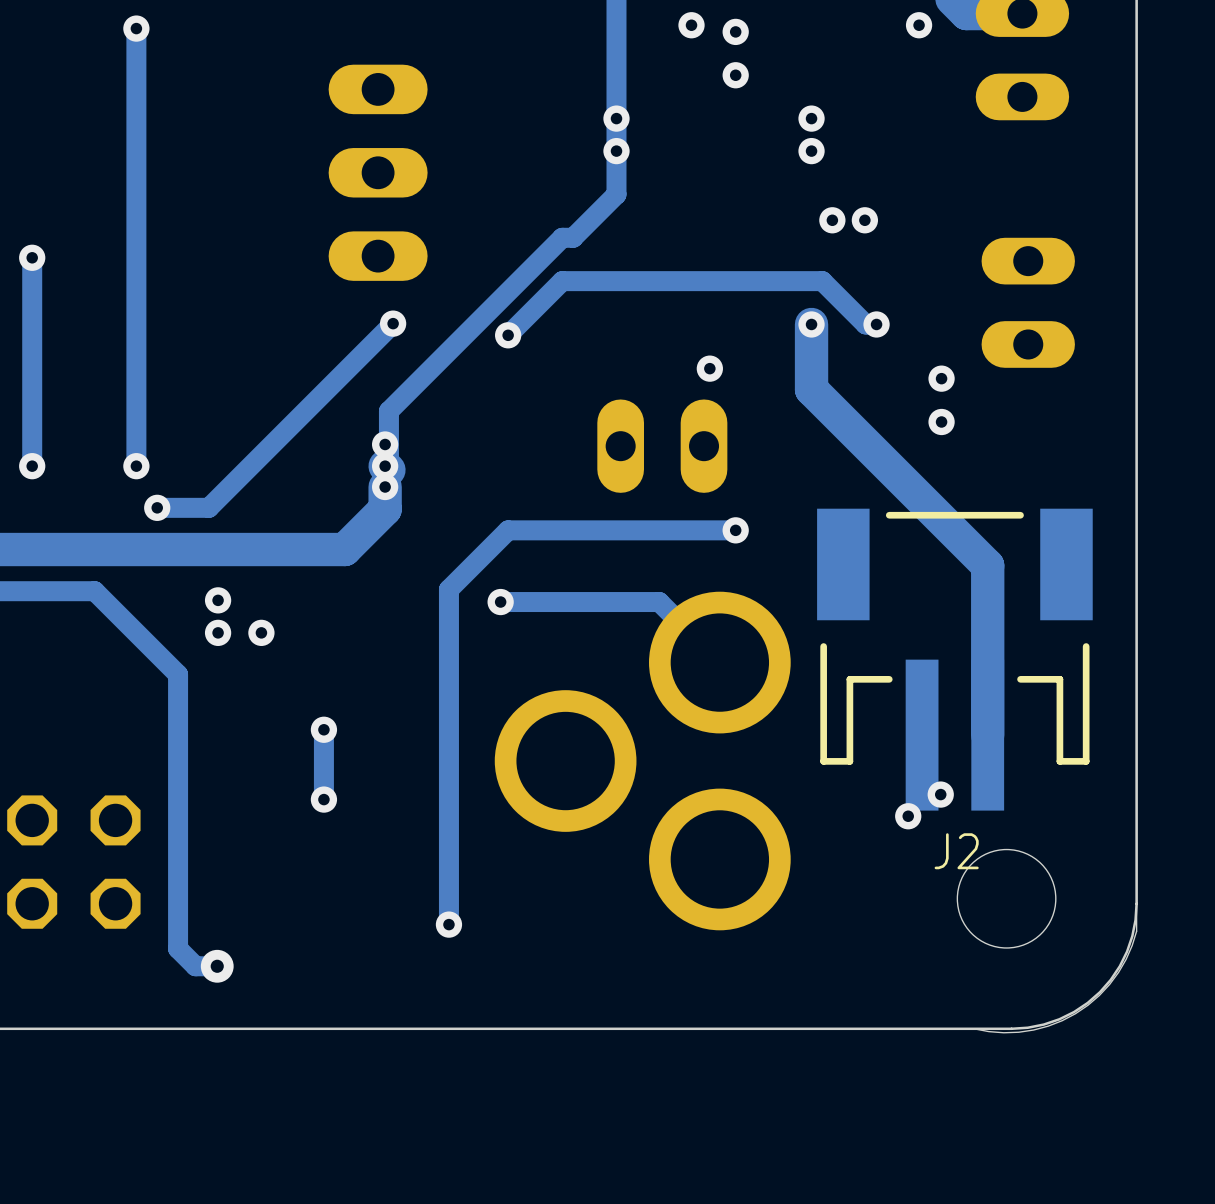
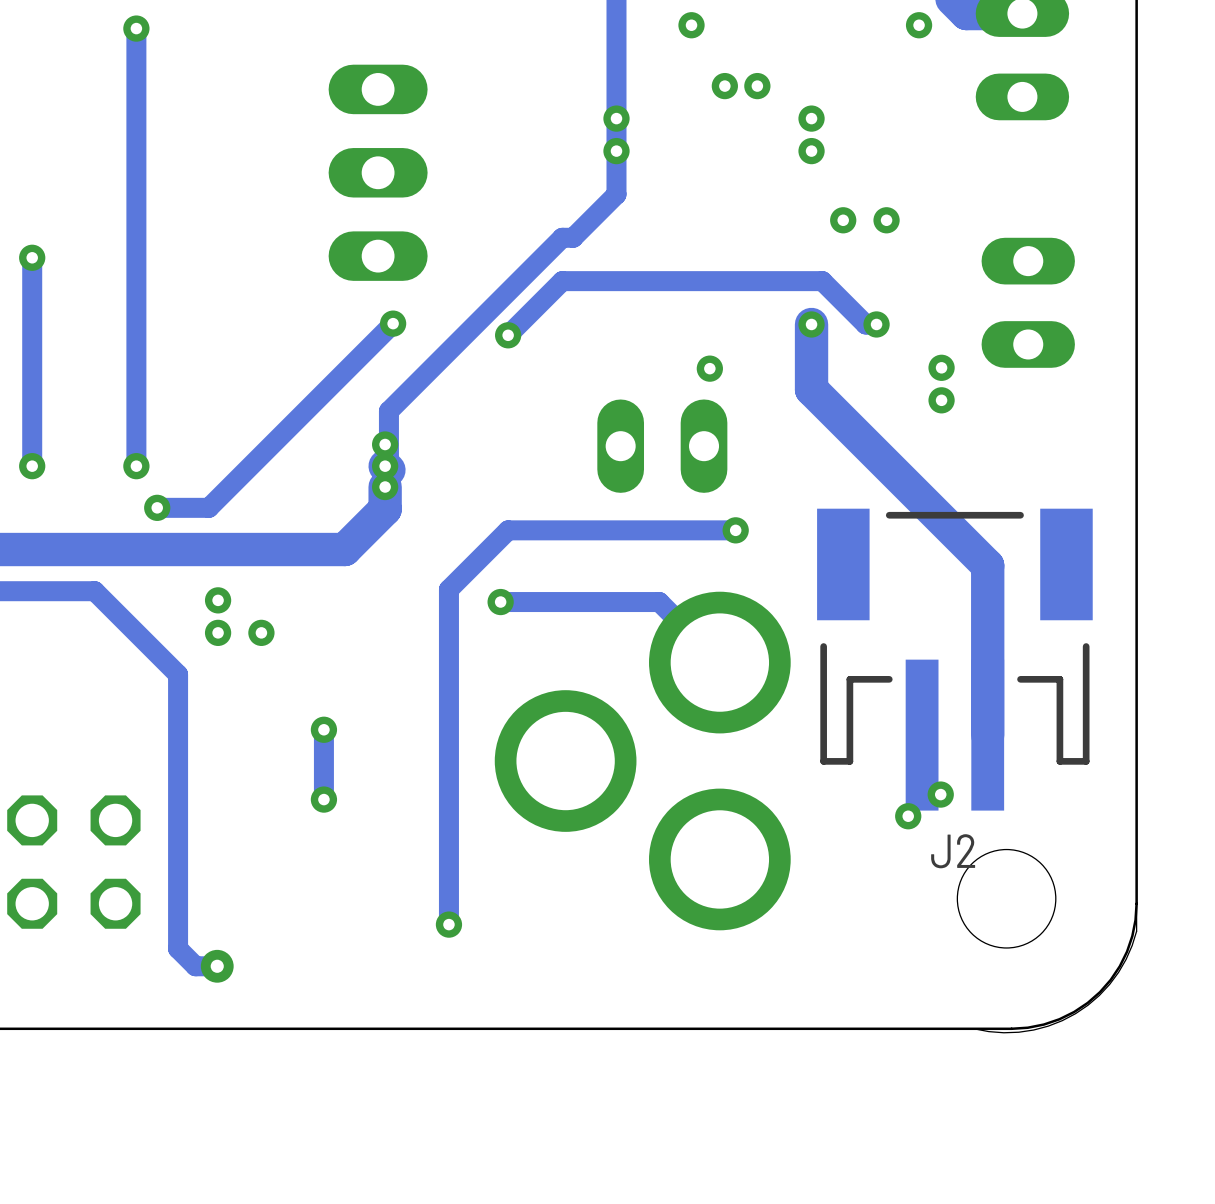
via: (735, 31) -> none
via: (735, 75) -> none
via: none -> (724, 86)
via: none -> (757, 86)
via: (832, 220) -> none
via: none -> (843, 220)
via: (864, 220) -> none
via: none -> (886, 220)
via: none -> (941, 367)
via: (941, 378) -> none
via: none -> (941, 400)
via: (941, 421) -> none

